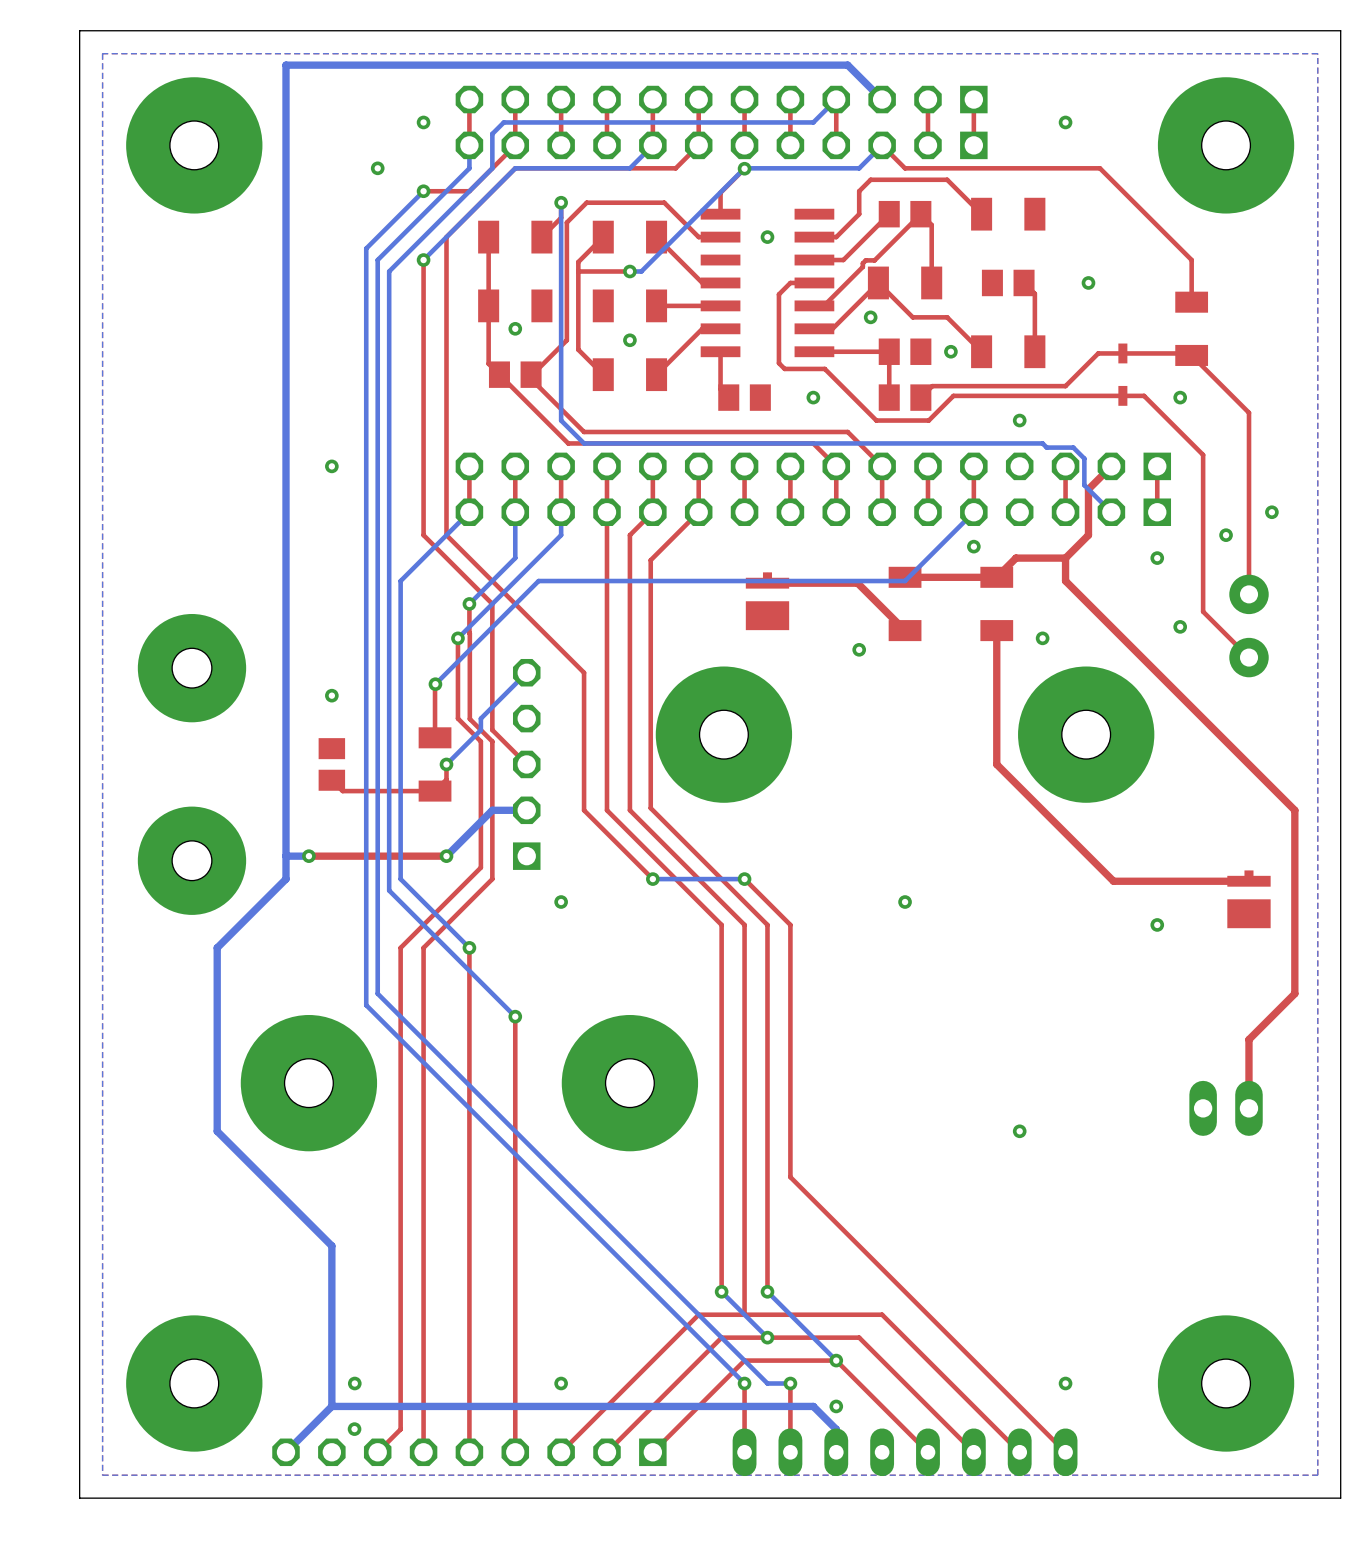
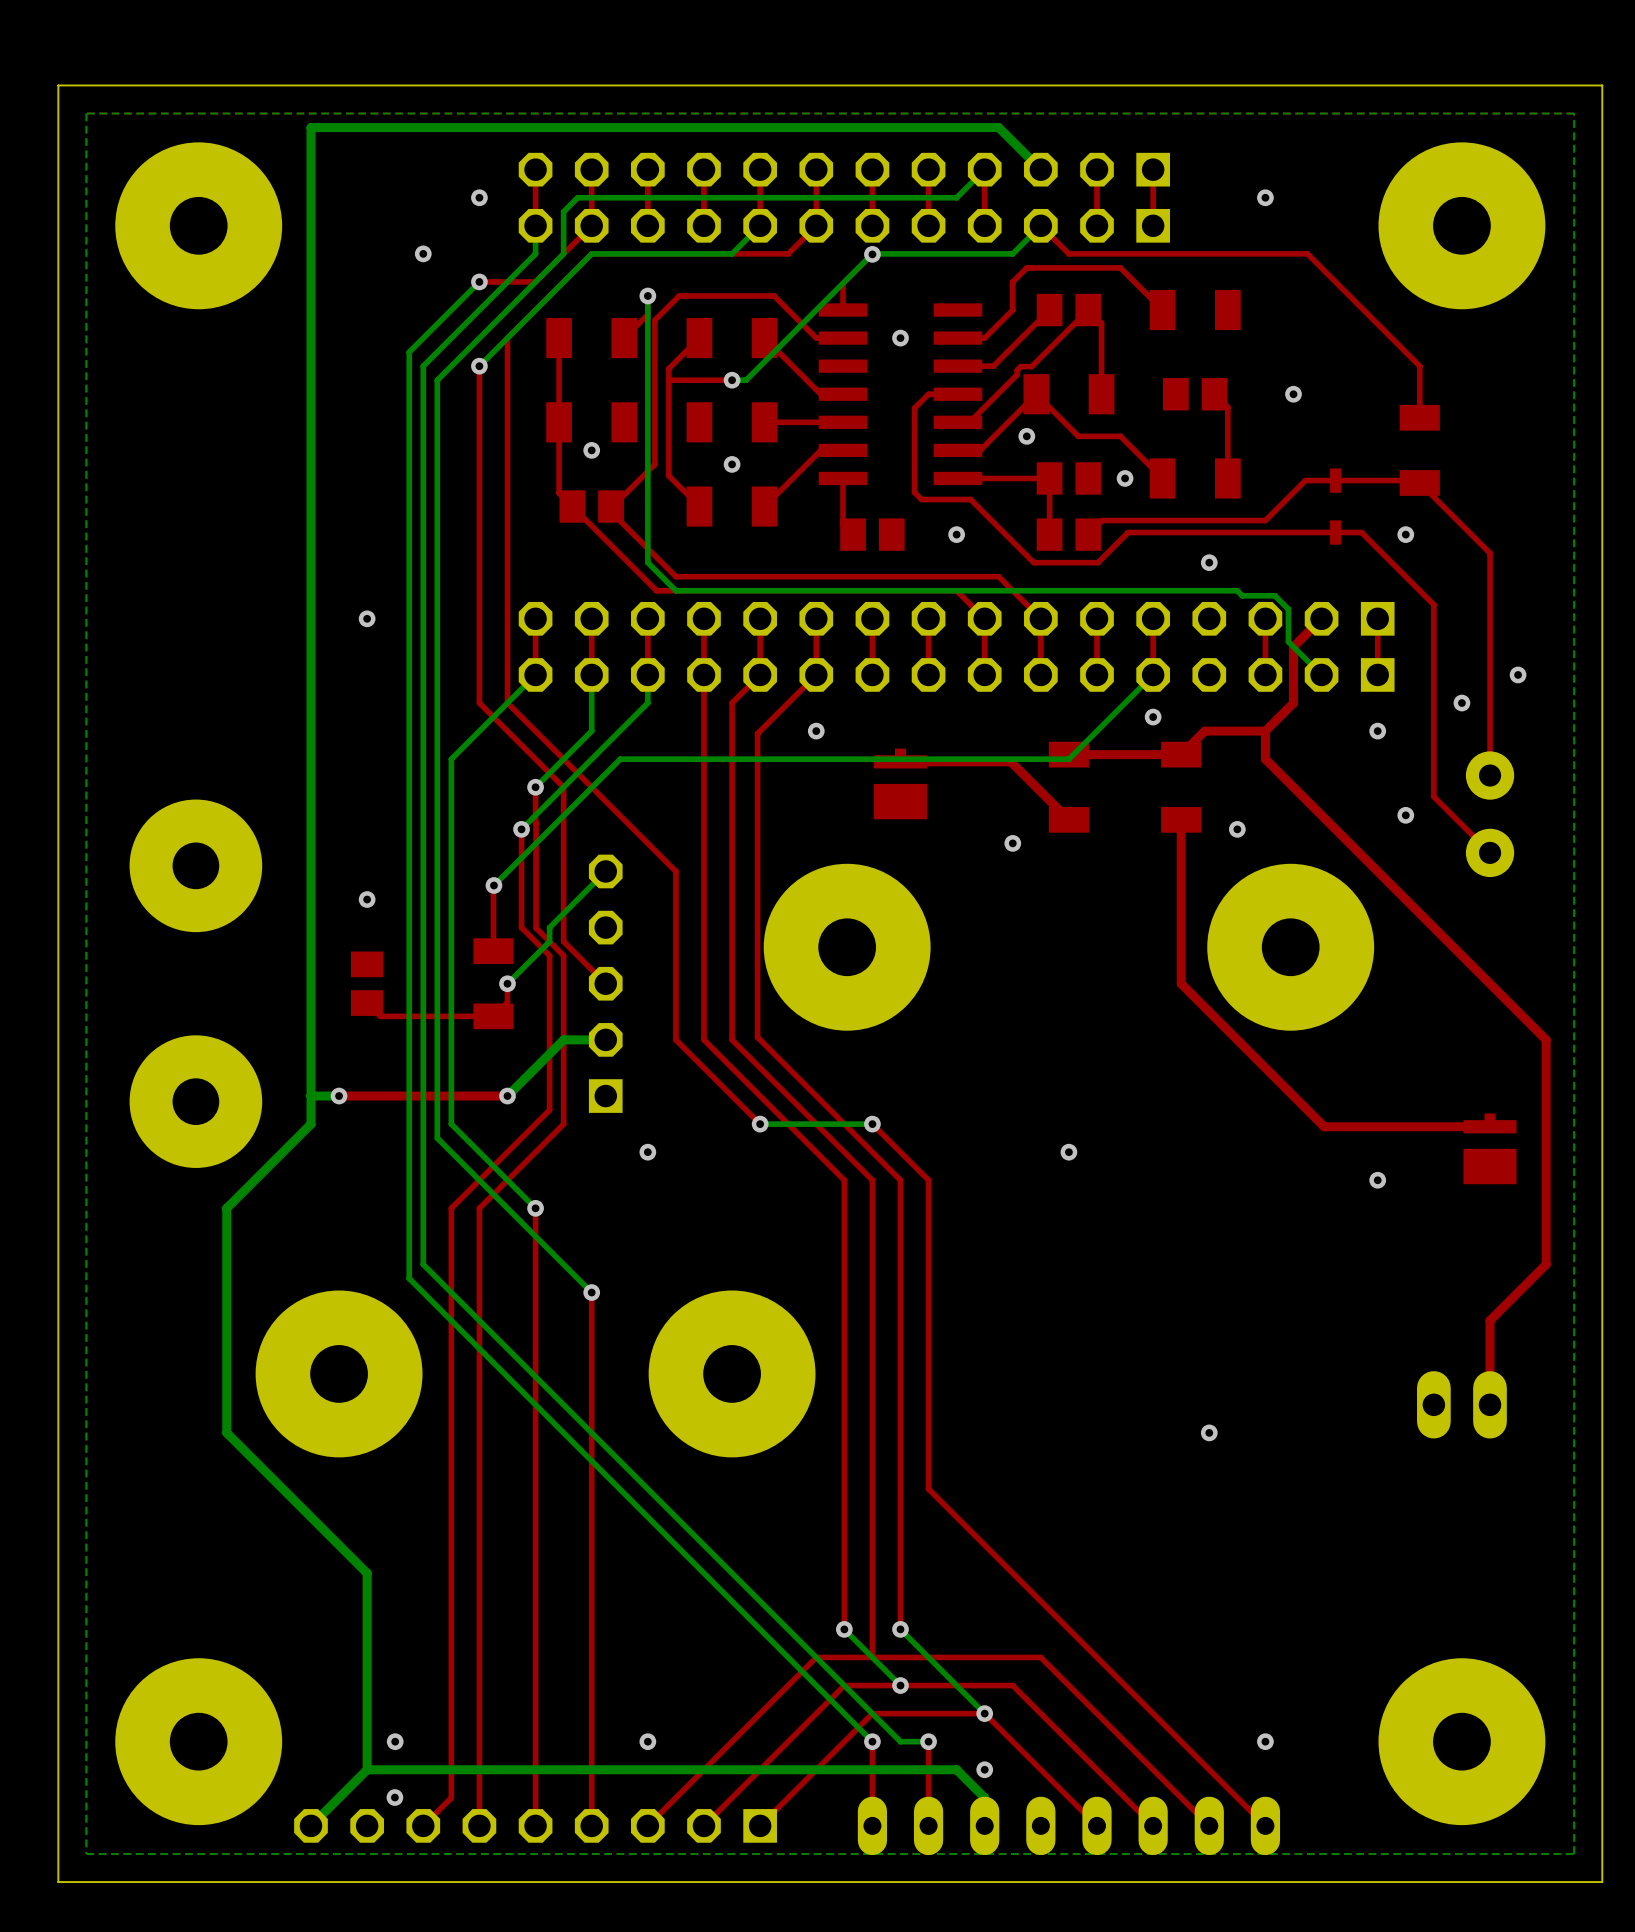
via: none -> (816, 731)

